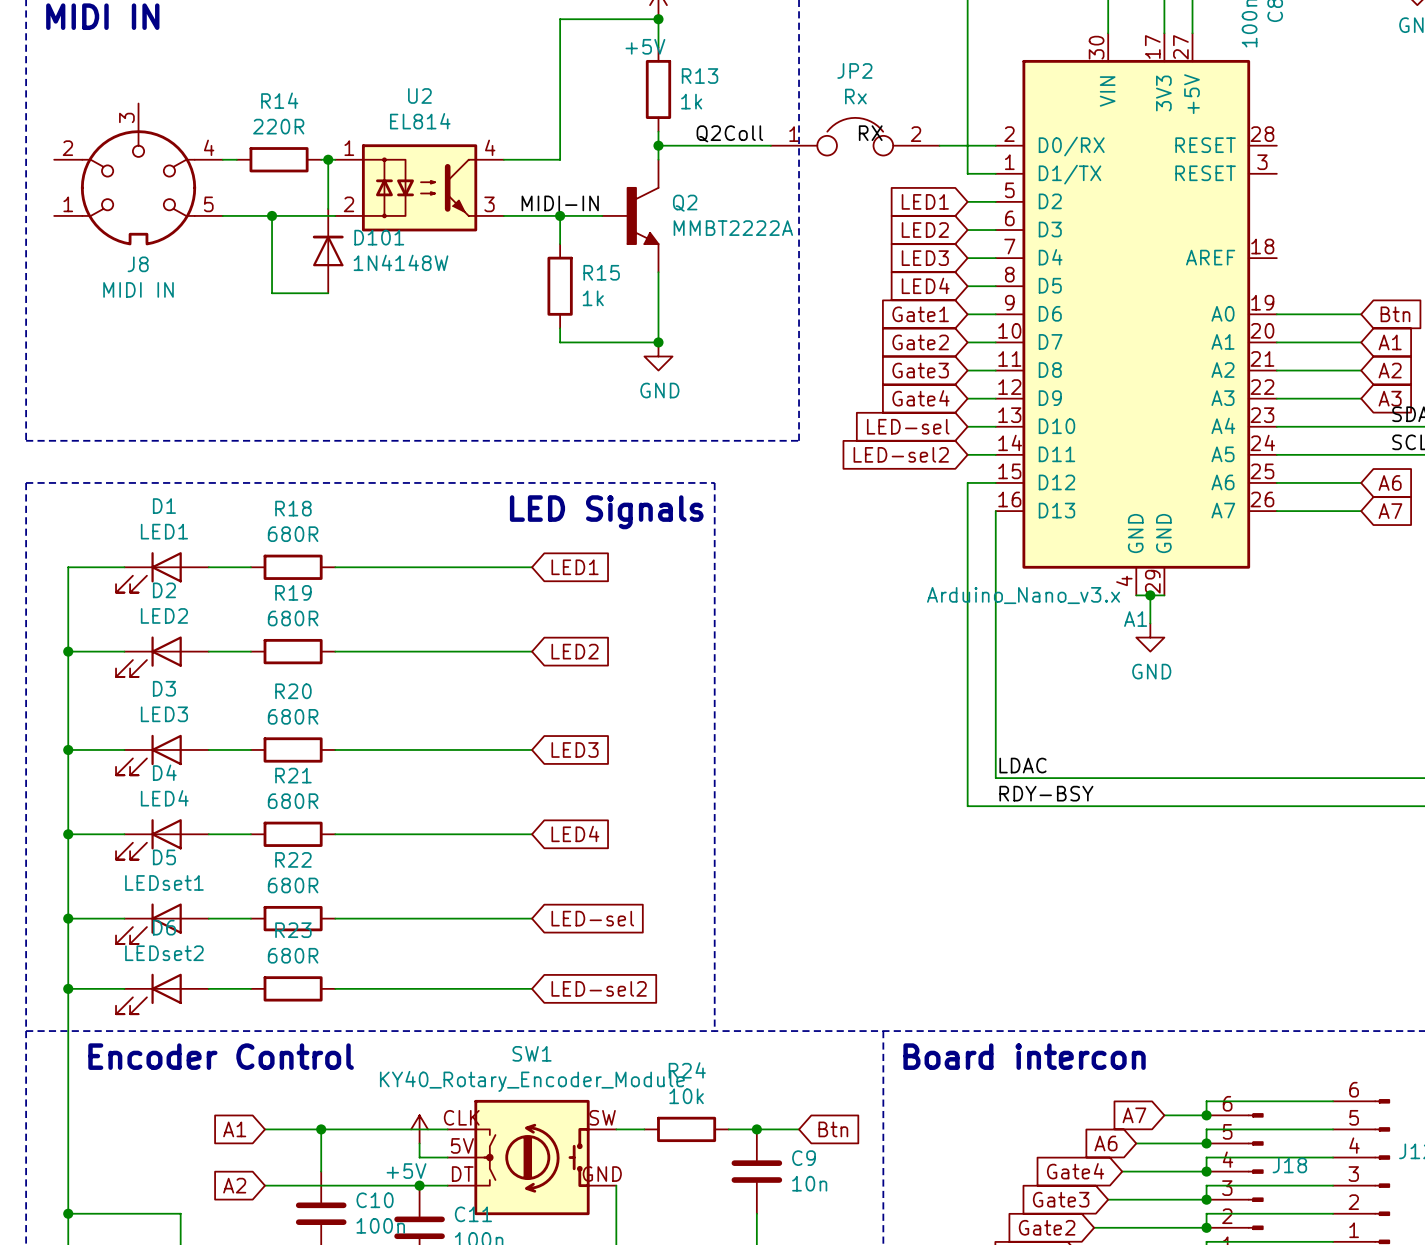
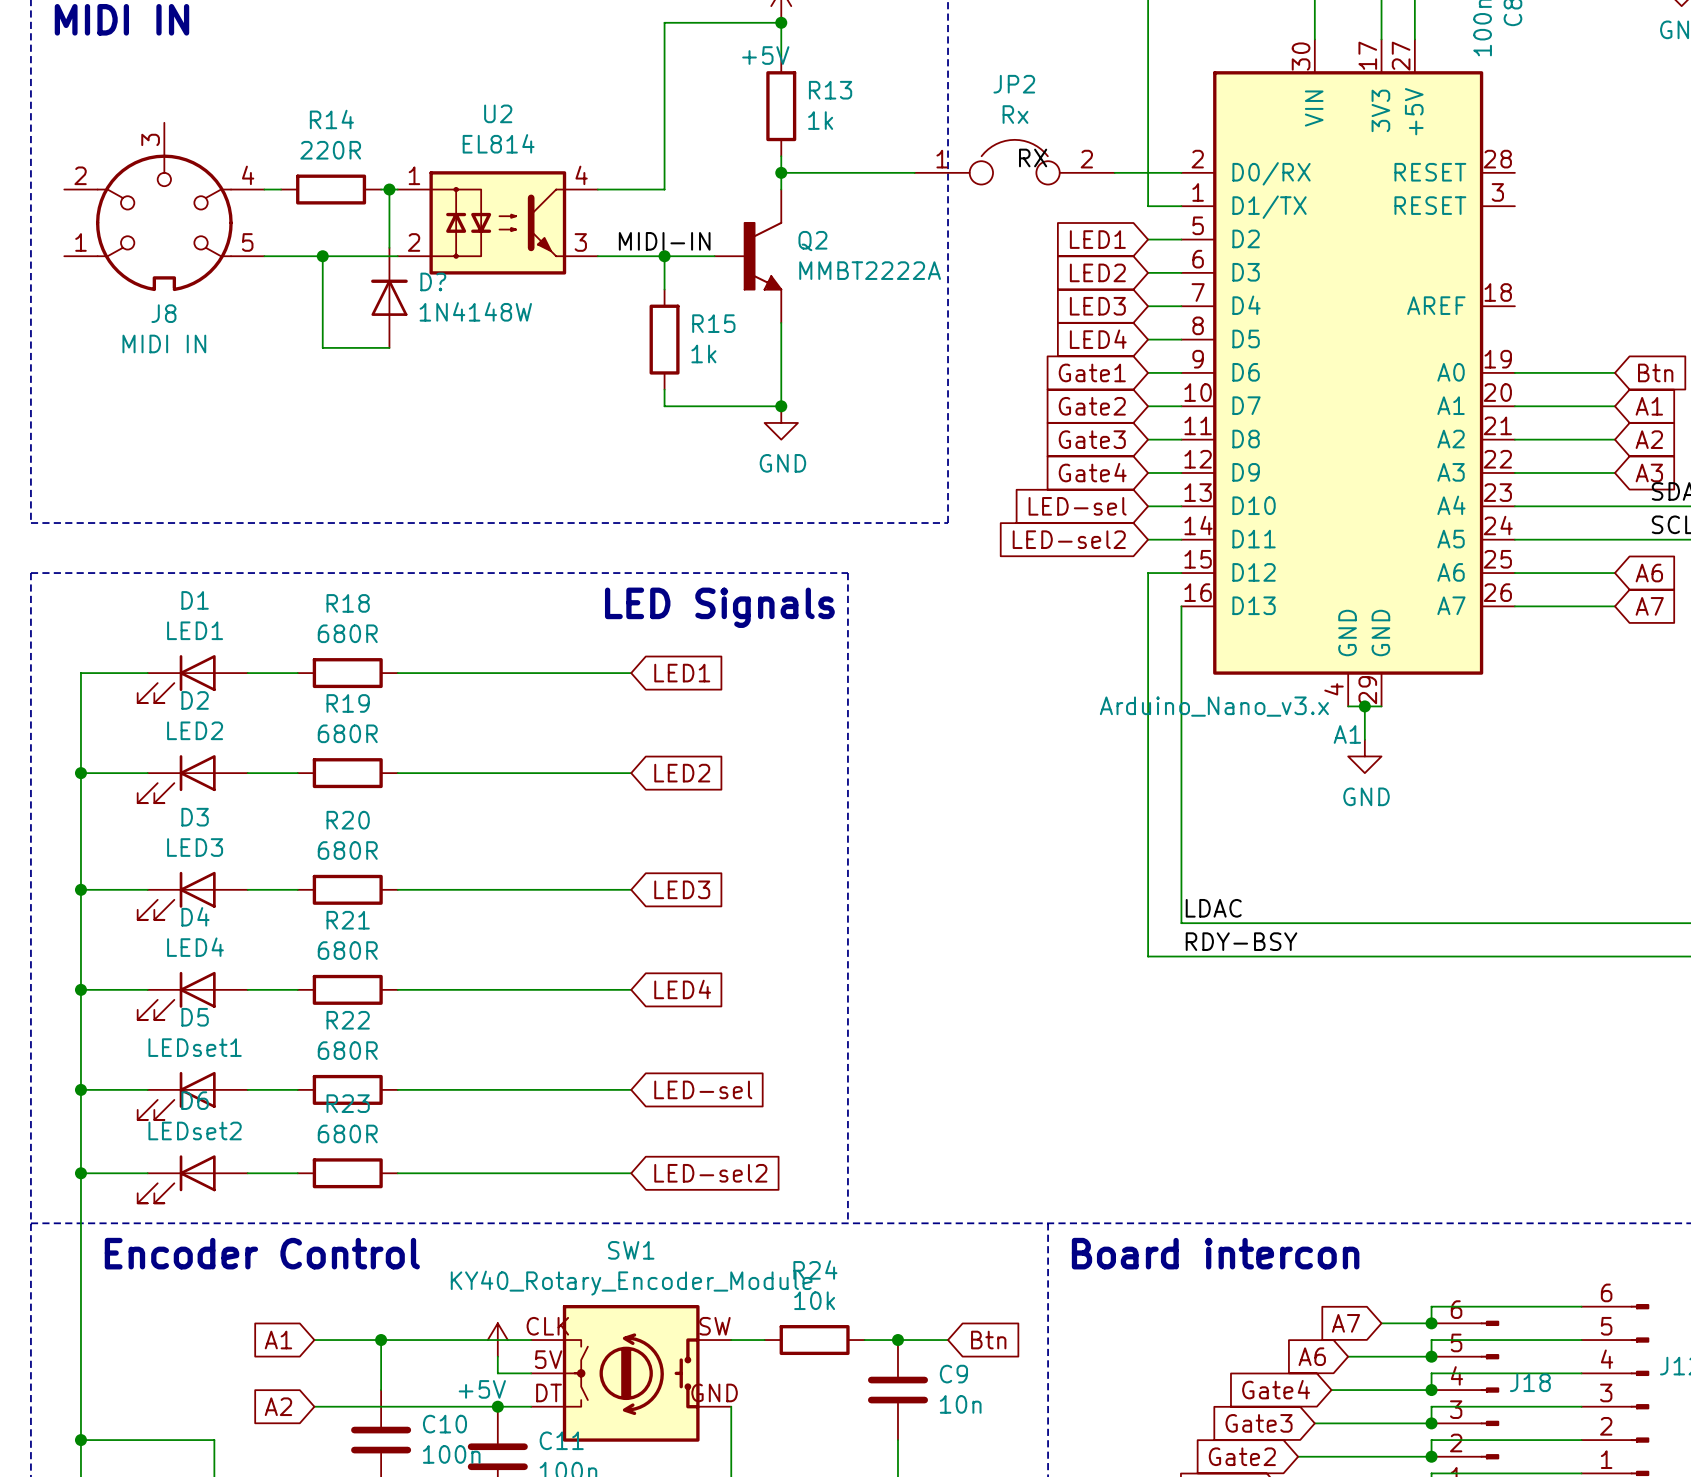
label: Q2Coll (729, 133) -> none
D101 name: D101 (379, 237) -> D? (433, 281)

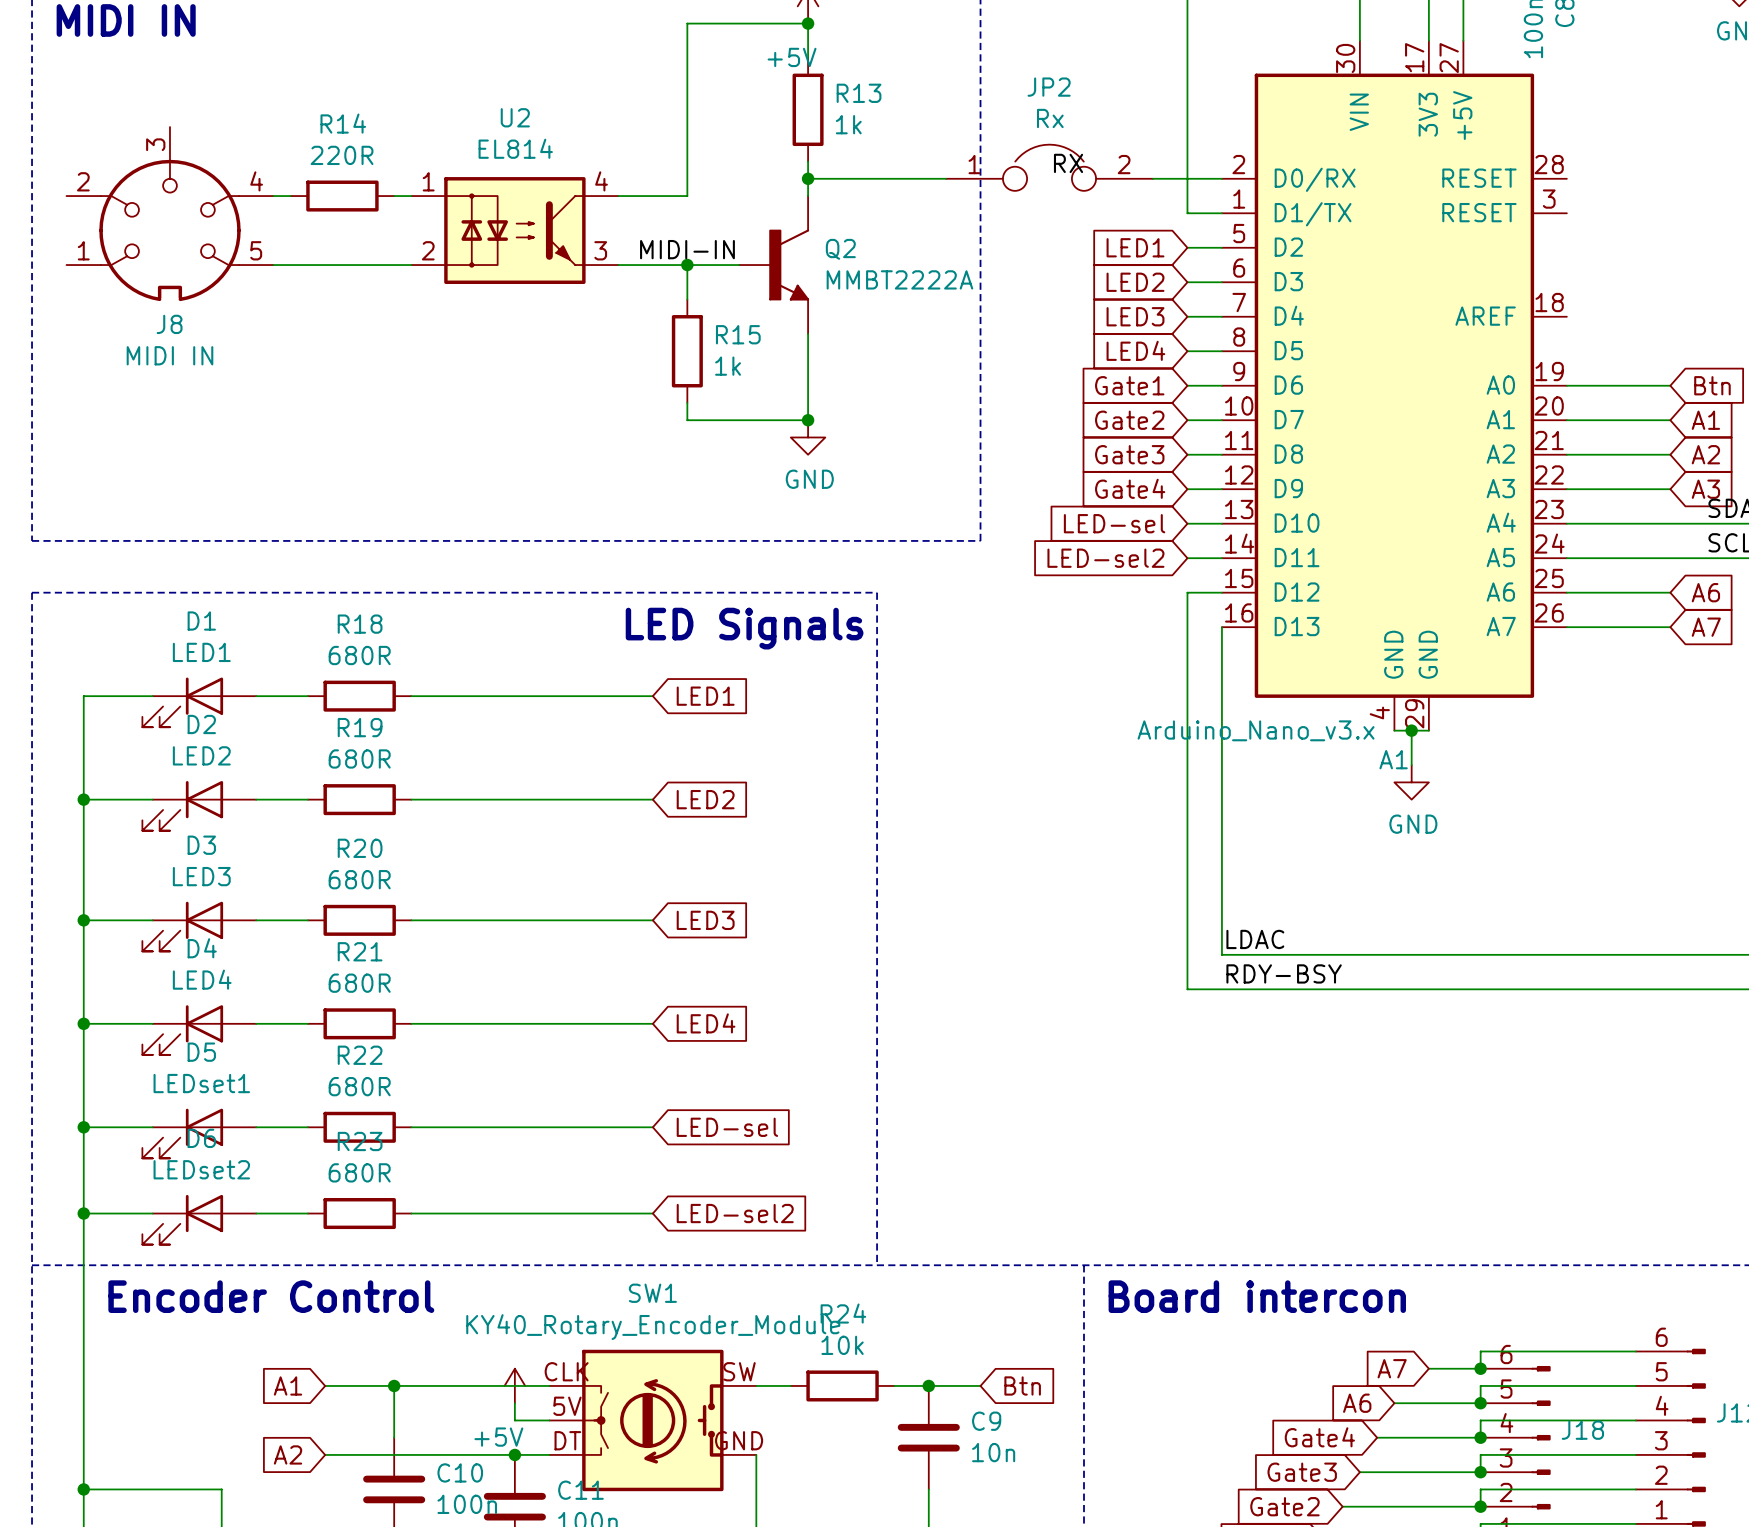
wire: (389, 189) (389, 247) -> none
junction: (389, 189) -> none
wire: (322, 256) (322, 347) (389, 347) -> none
junction: (322, 256) -> none
D?: 1N4148W (389, 297) -> none

